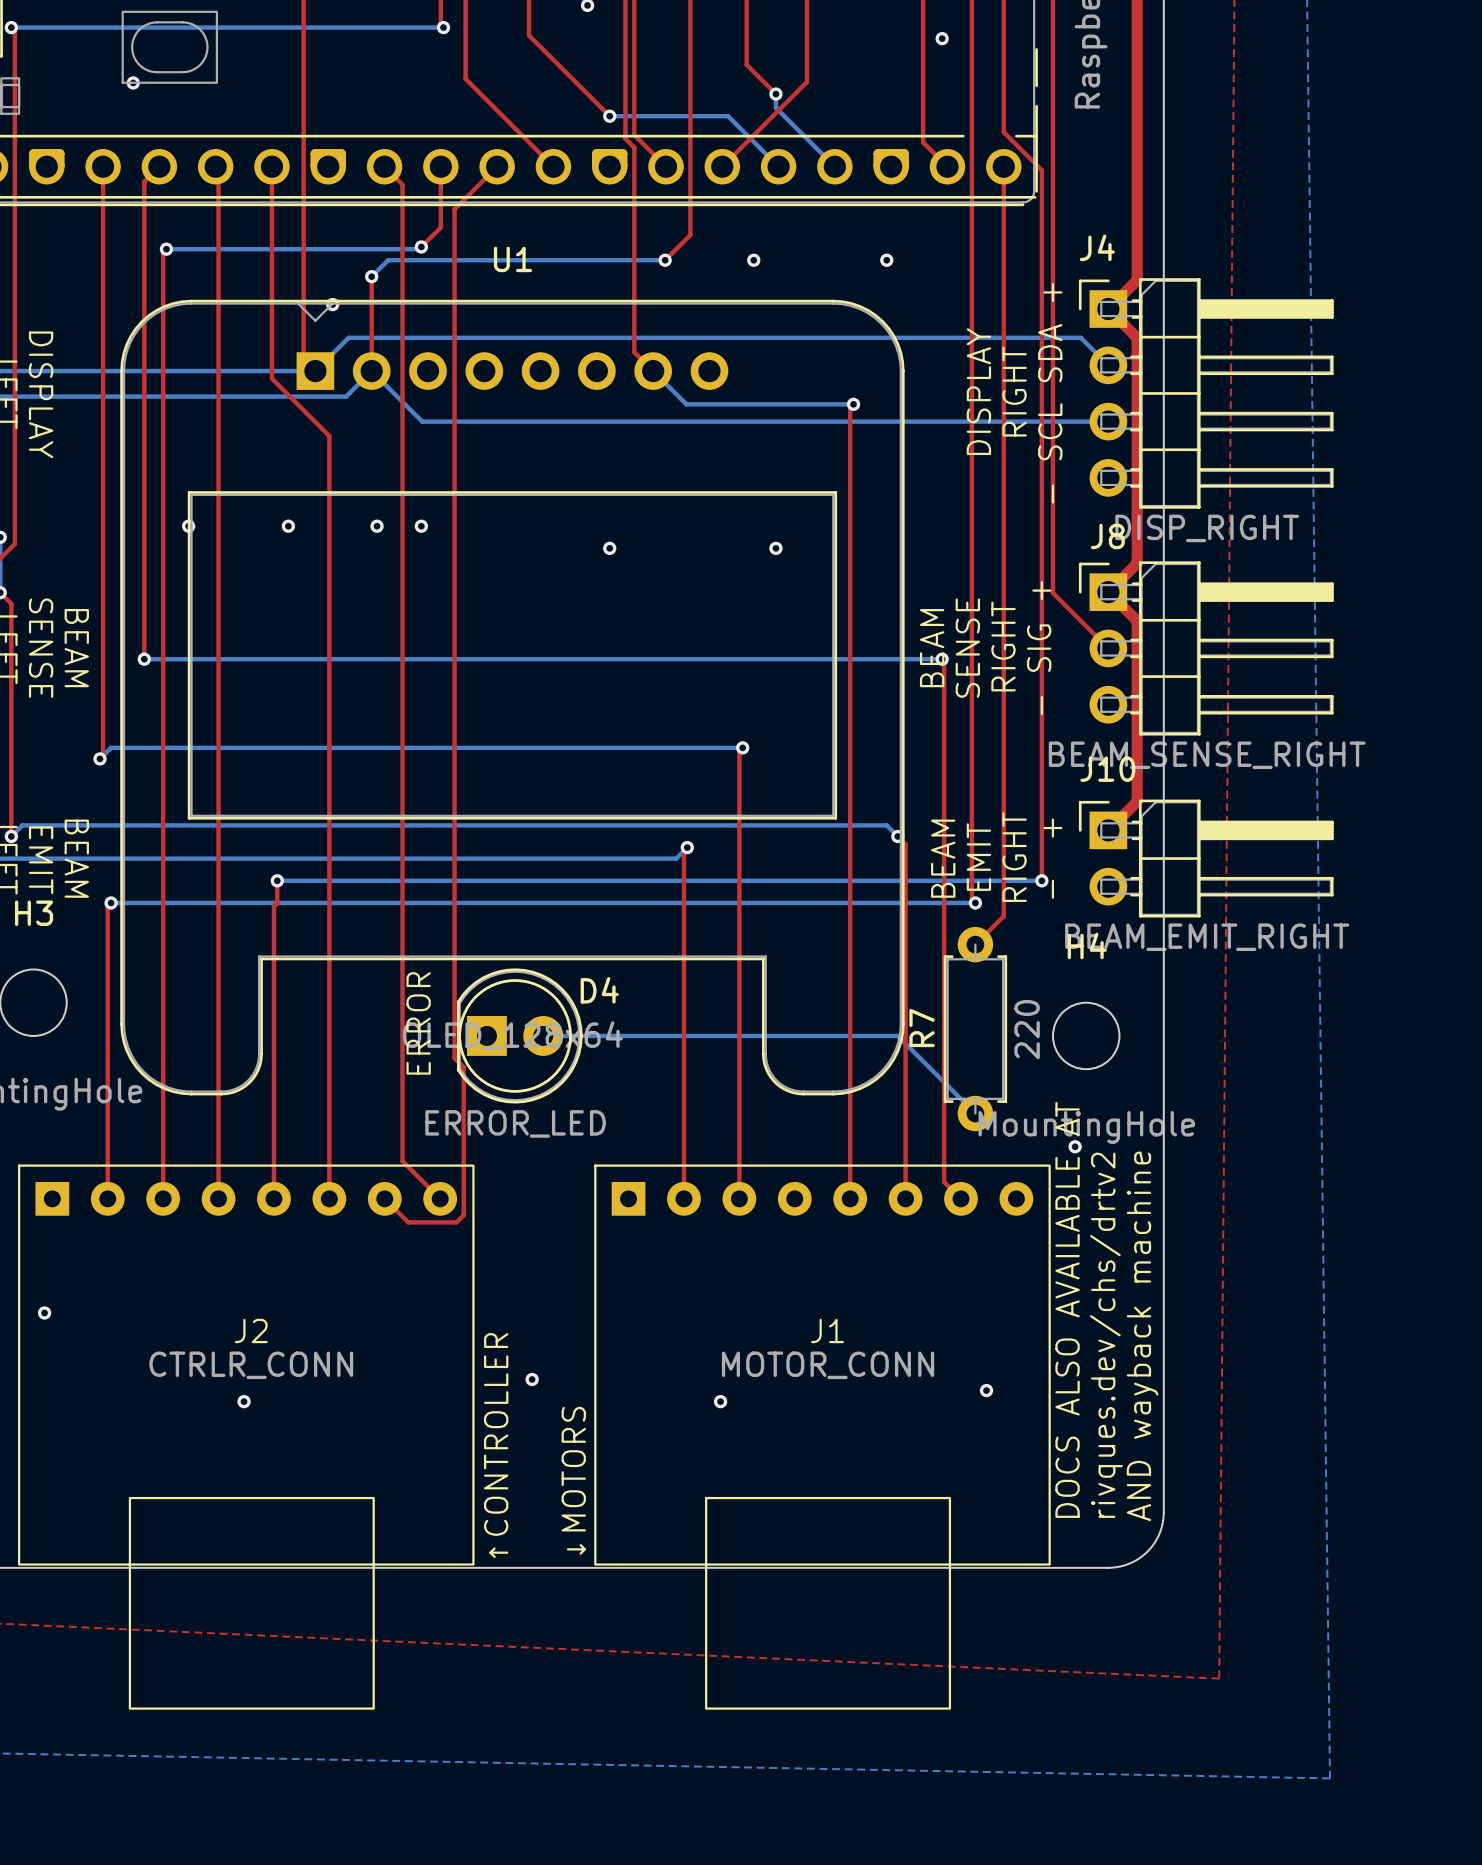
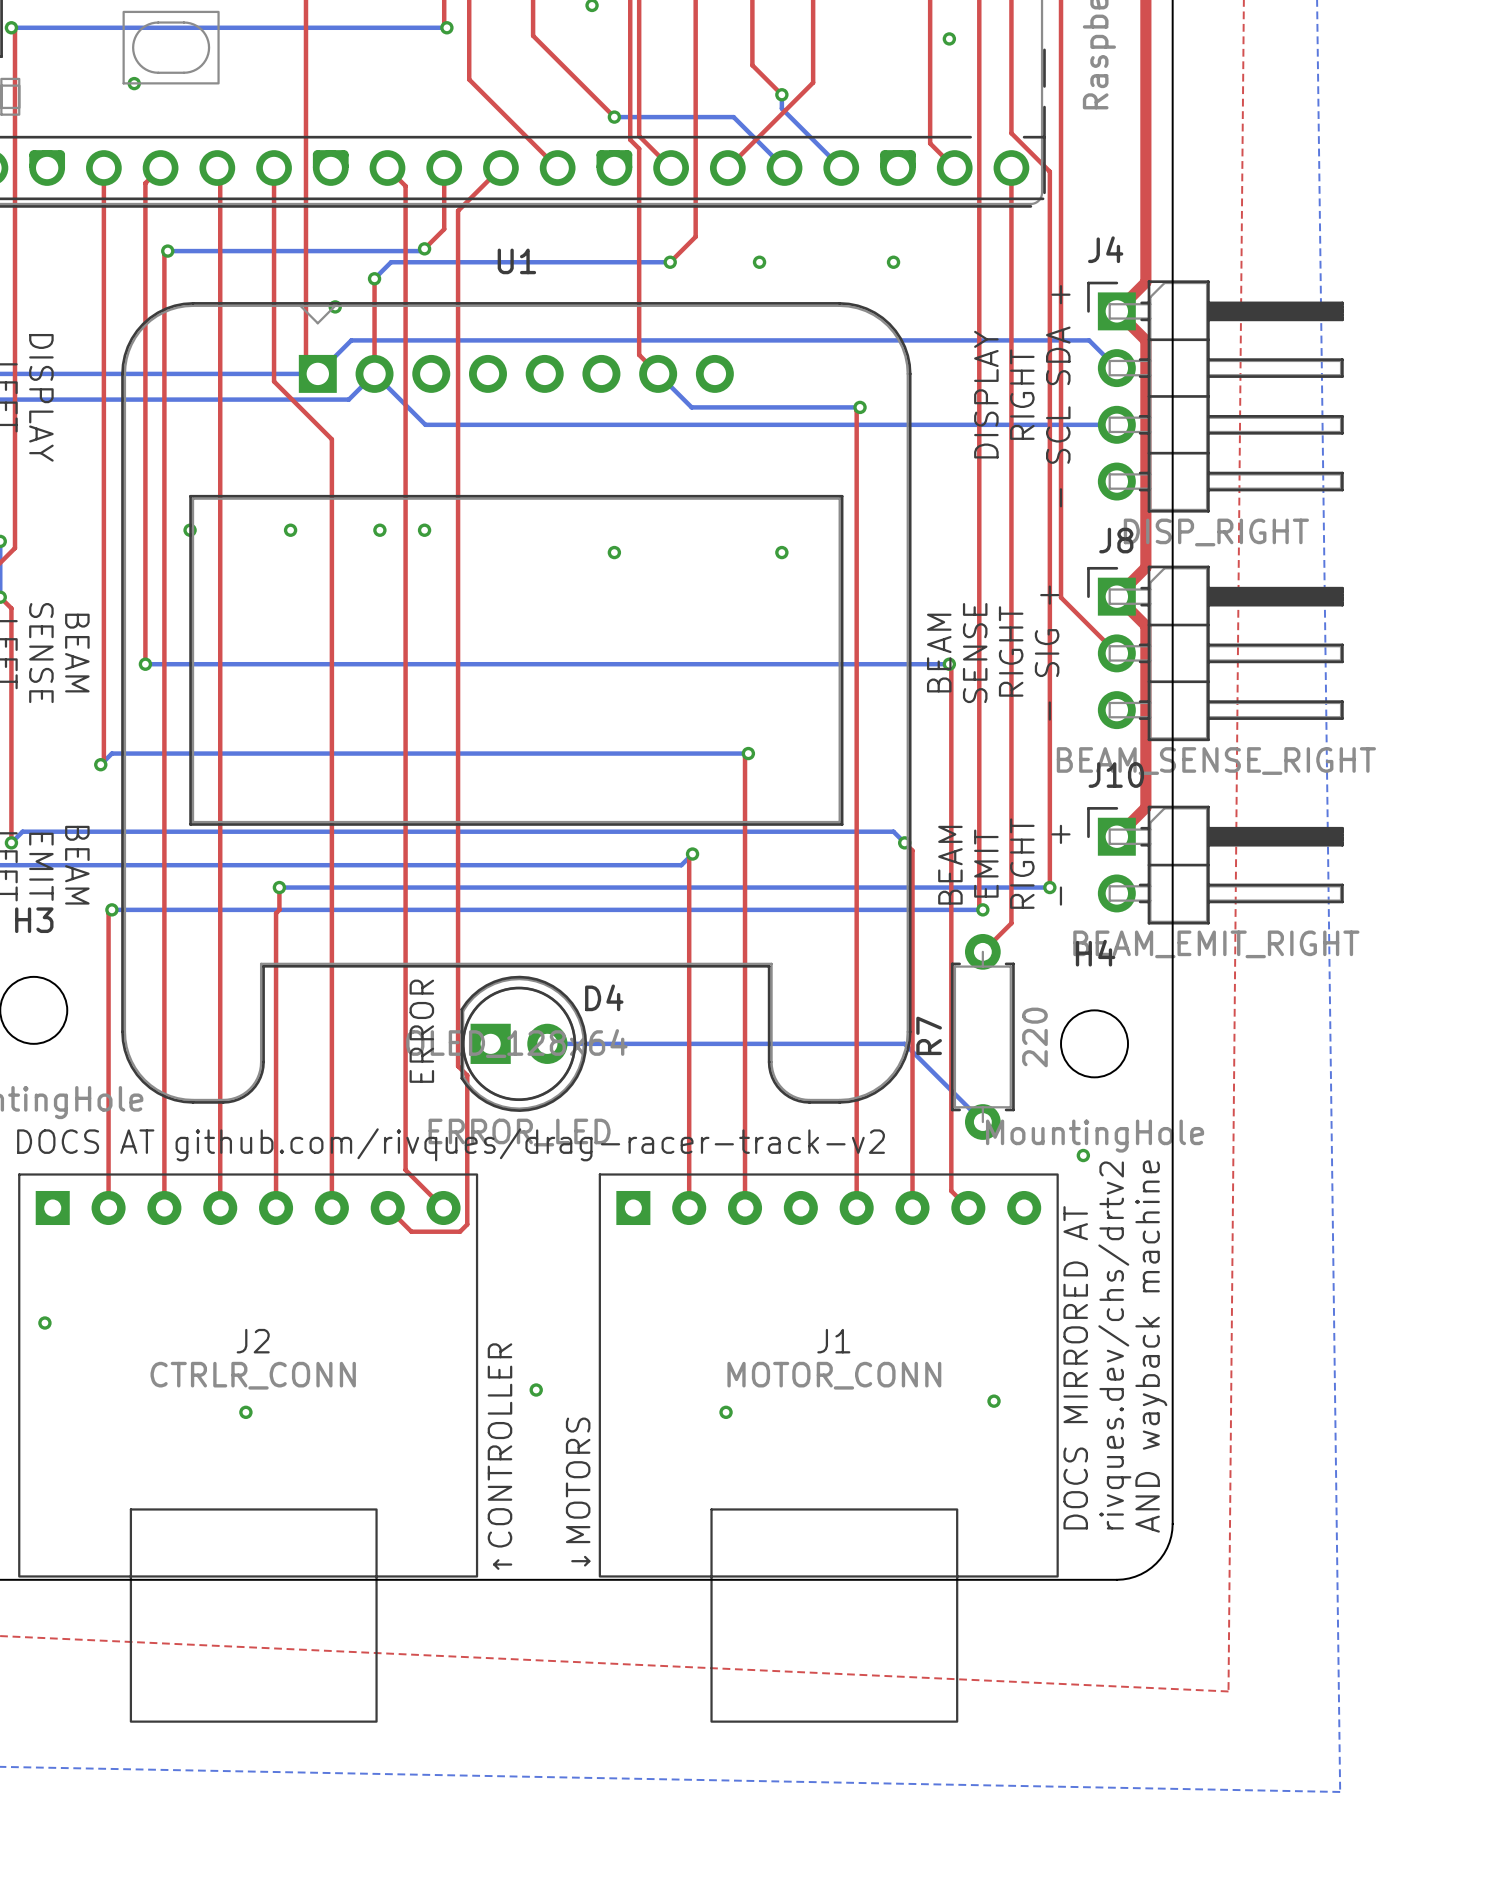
text: none -> DOCS AT github.com/rivques/drag-racer-track-v2 (451, 1144)
text: DOCS ALSO AVAILABLE AT (1067, 1309) -> DOCS MIRRORED AT (1075, 1367)

